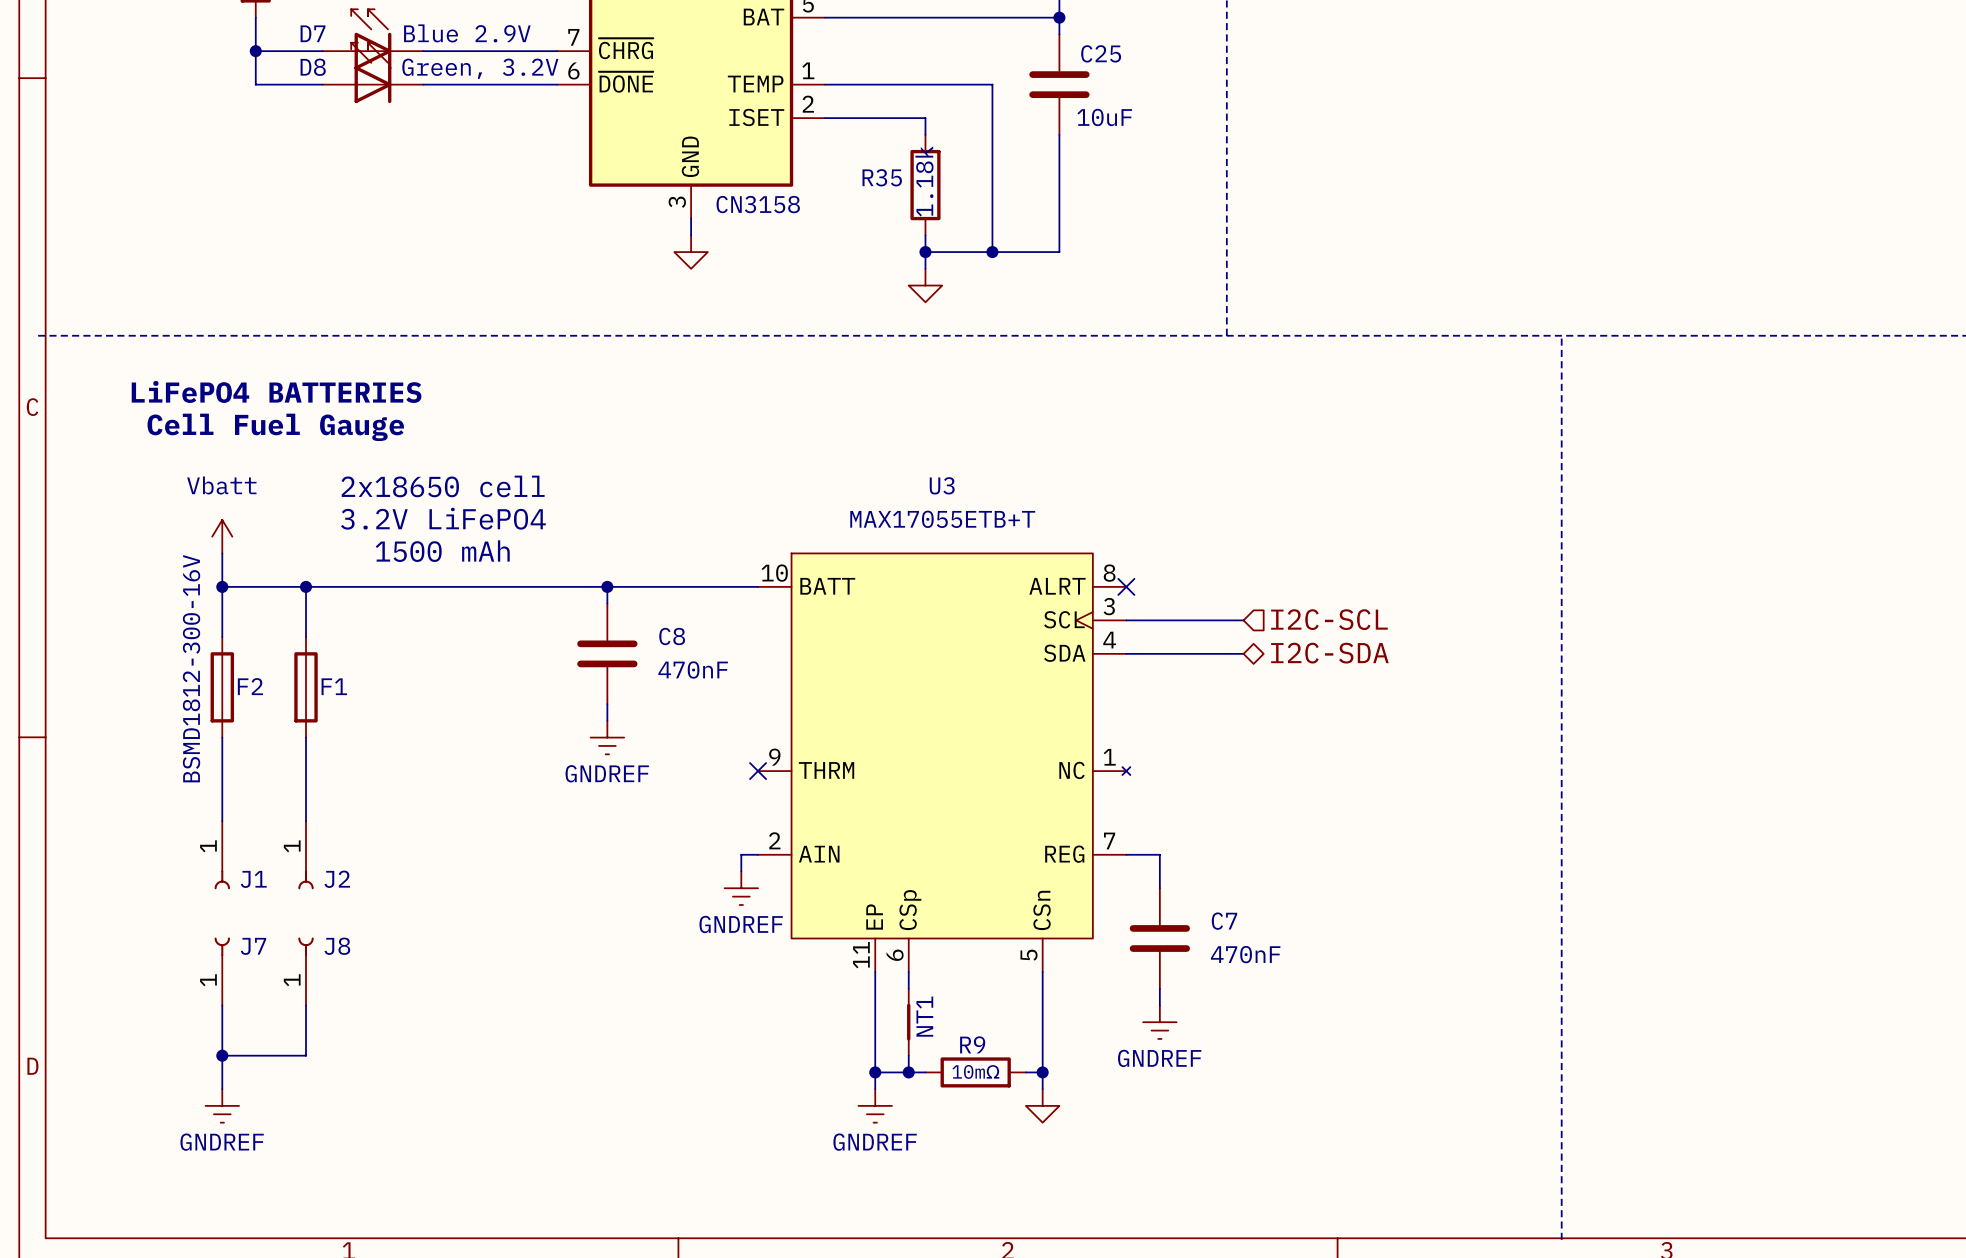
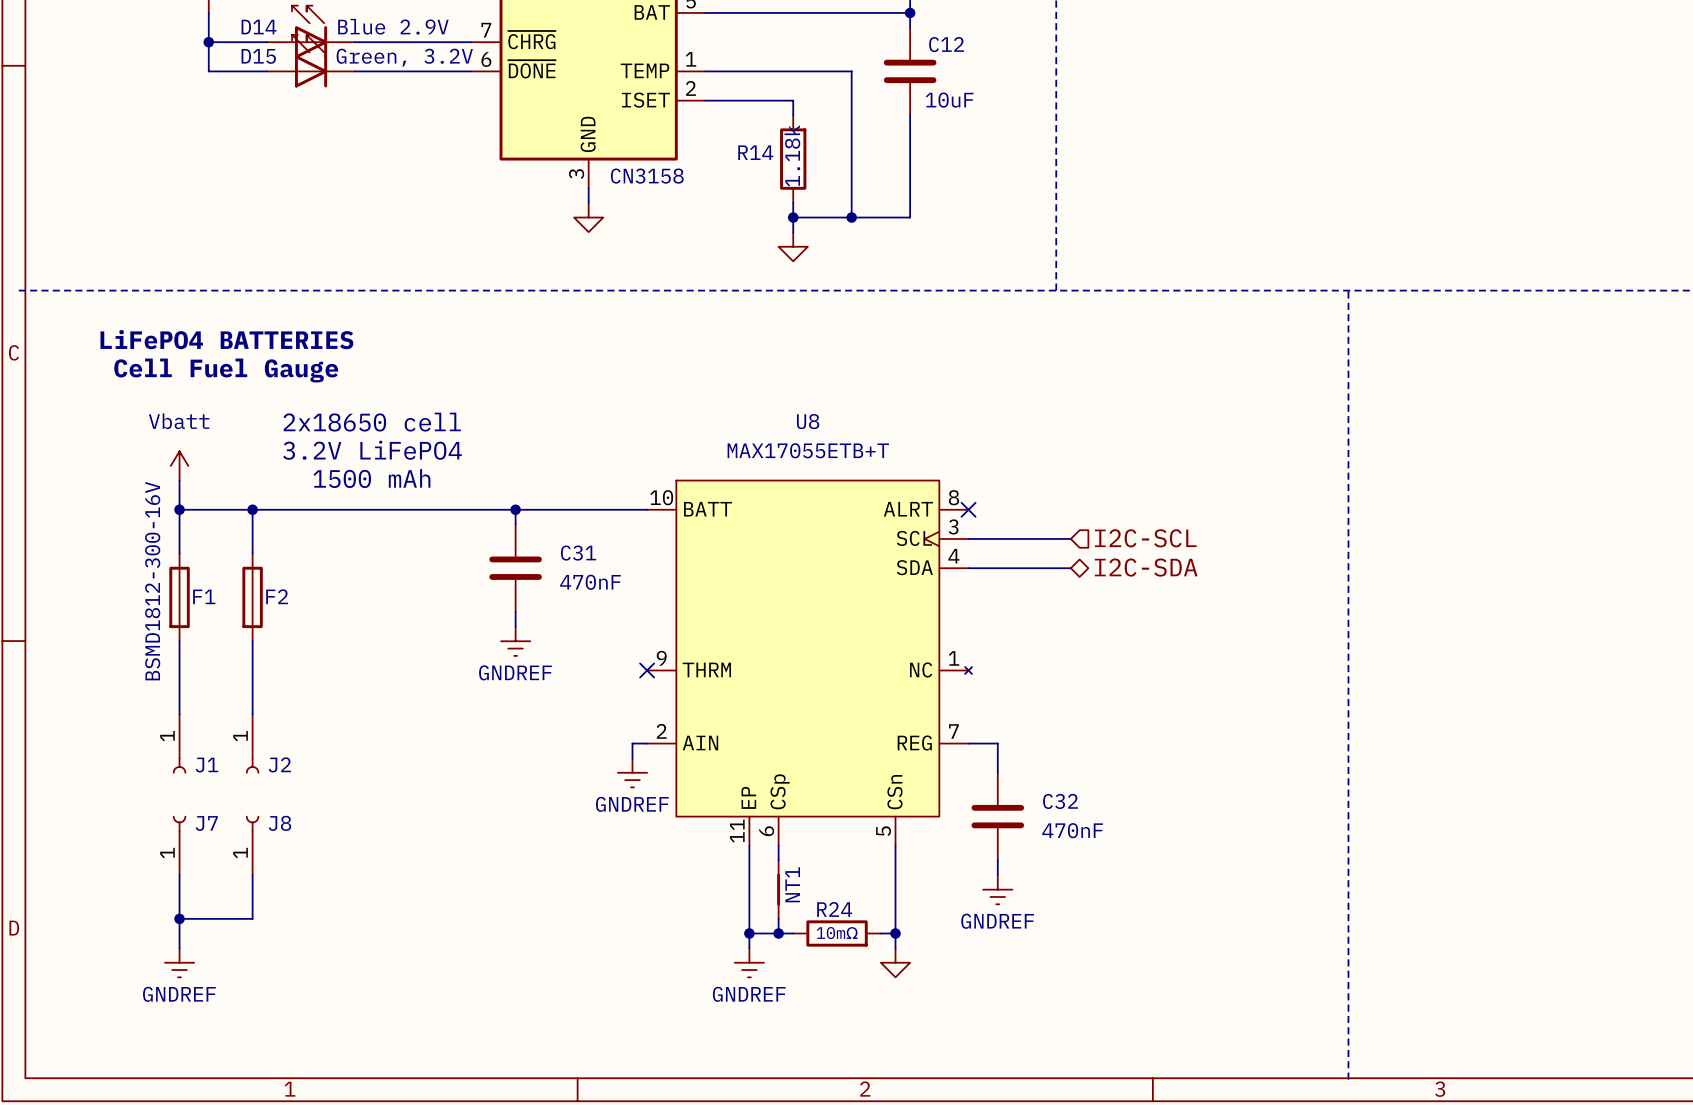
D7 name: D7 (313, 33) -> D14 (259, 27)
C25 name: C25 (1101, 53) -> C12 (946, 44)
D8 name: D8 (313, 67) -> D15 (258, 56)
R35 name: R35 (882, 177) -> R14 (755, 152)
U3 name: U3 (942, 485) -> U8 (808, 421)
C8 name: C8 (672, 636) -> C31 (578, 553)
F2 name: F2 (250, 686) -> F1 (204, 596)
F1 name: F1 (334, 686) -> F2 (277, 596)
C7 name: C7 (1224, 921) -> C32 (1060, 801)
R9 name: R9 (972, 1044) -> R24 (834, 909)

